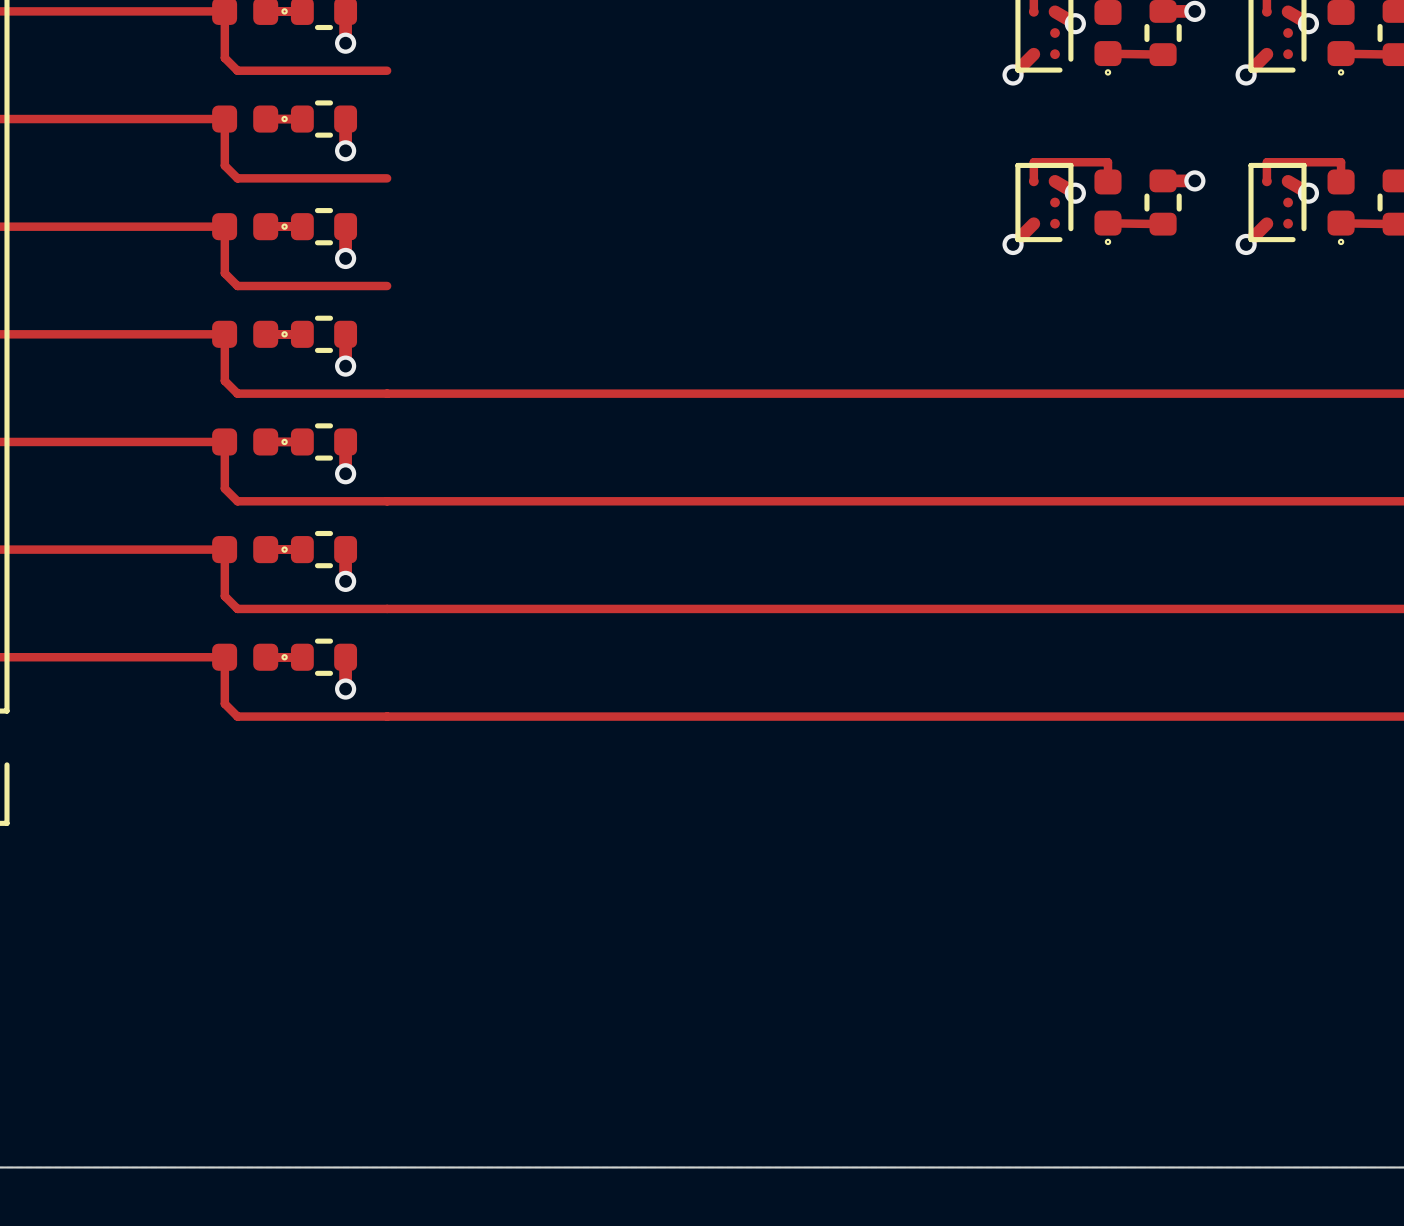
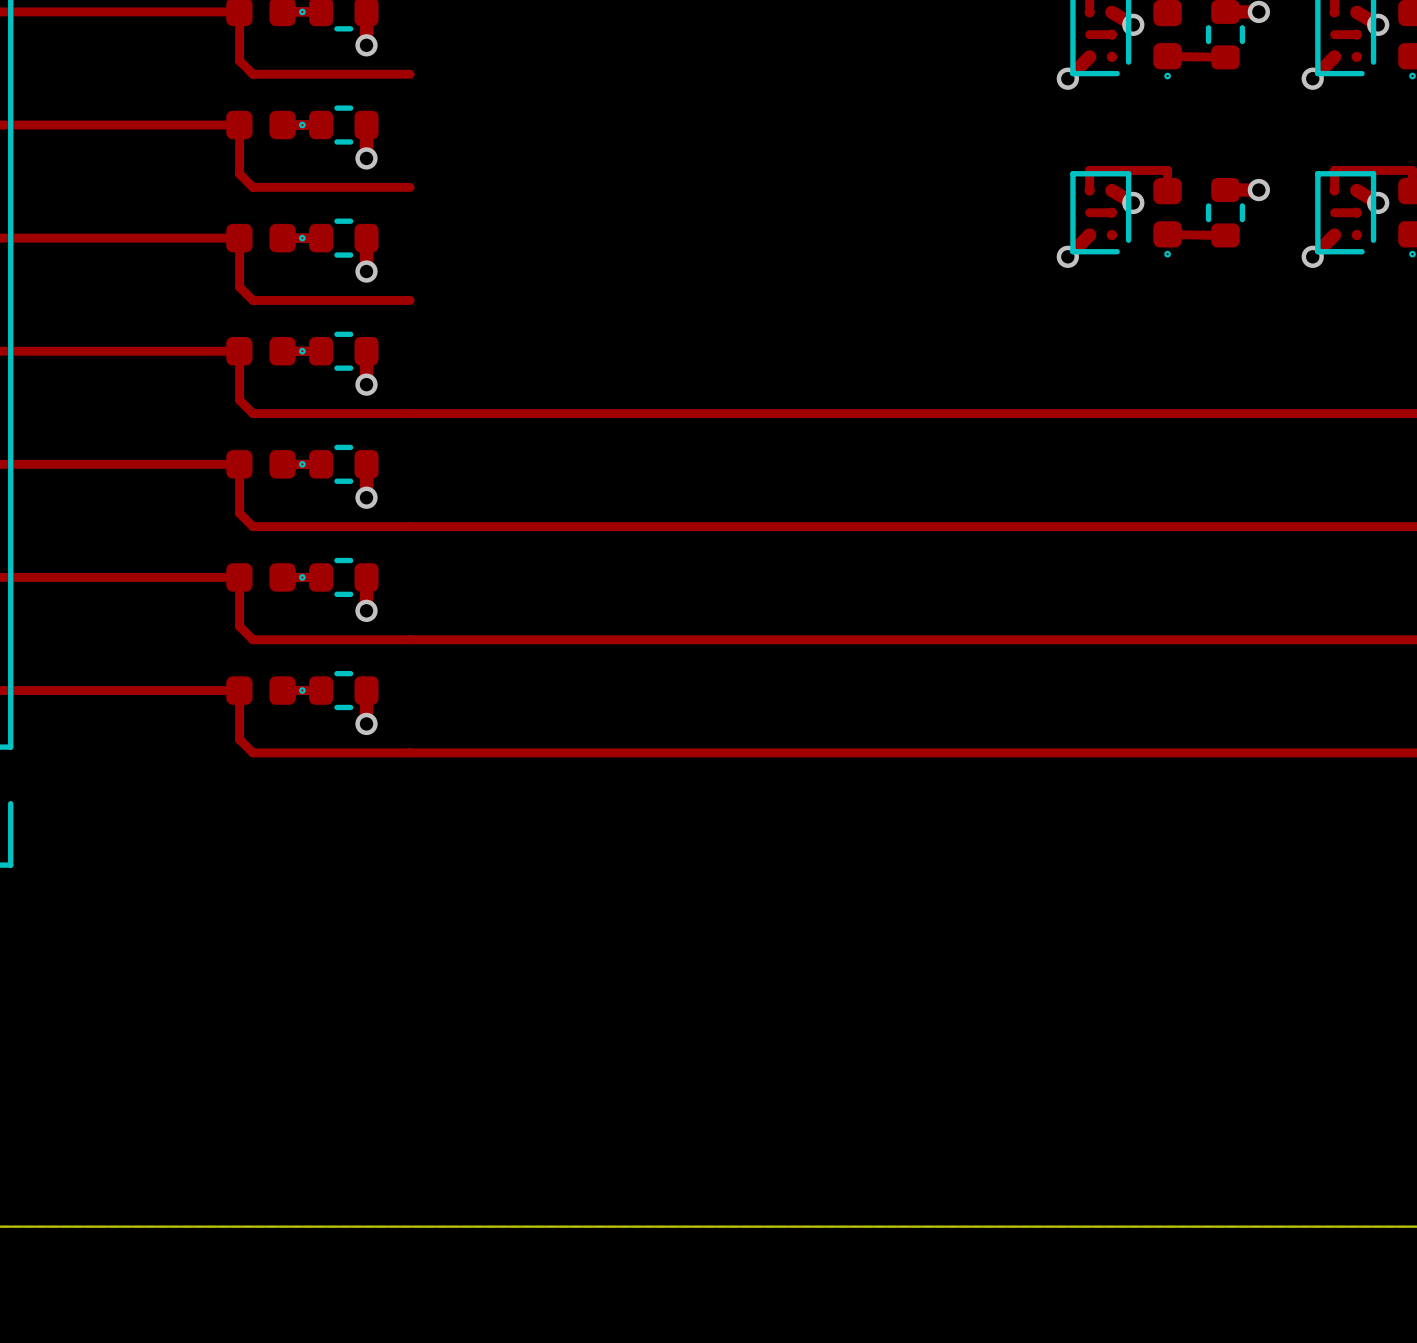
top track: none -> (1089, 34) (1111, 34)
top track: none -> (1334, 34) (1356, 34)
top track: none -> (1089, 212) (1111, 212)
top track: none -> (1334, 212) (1356, 212)

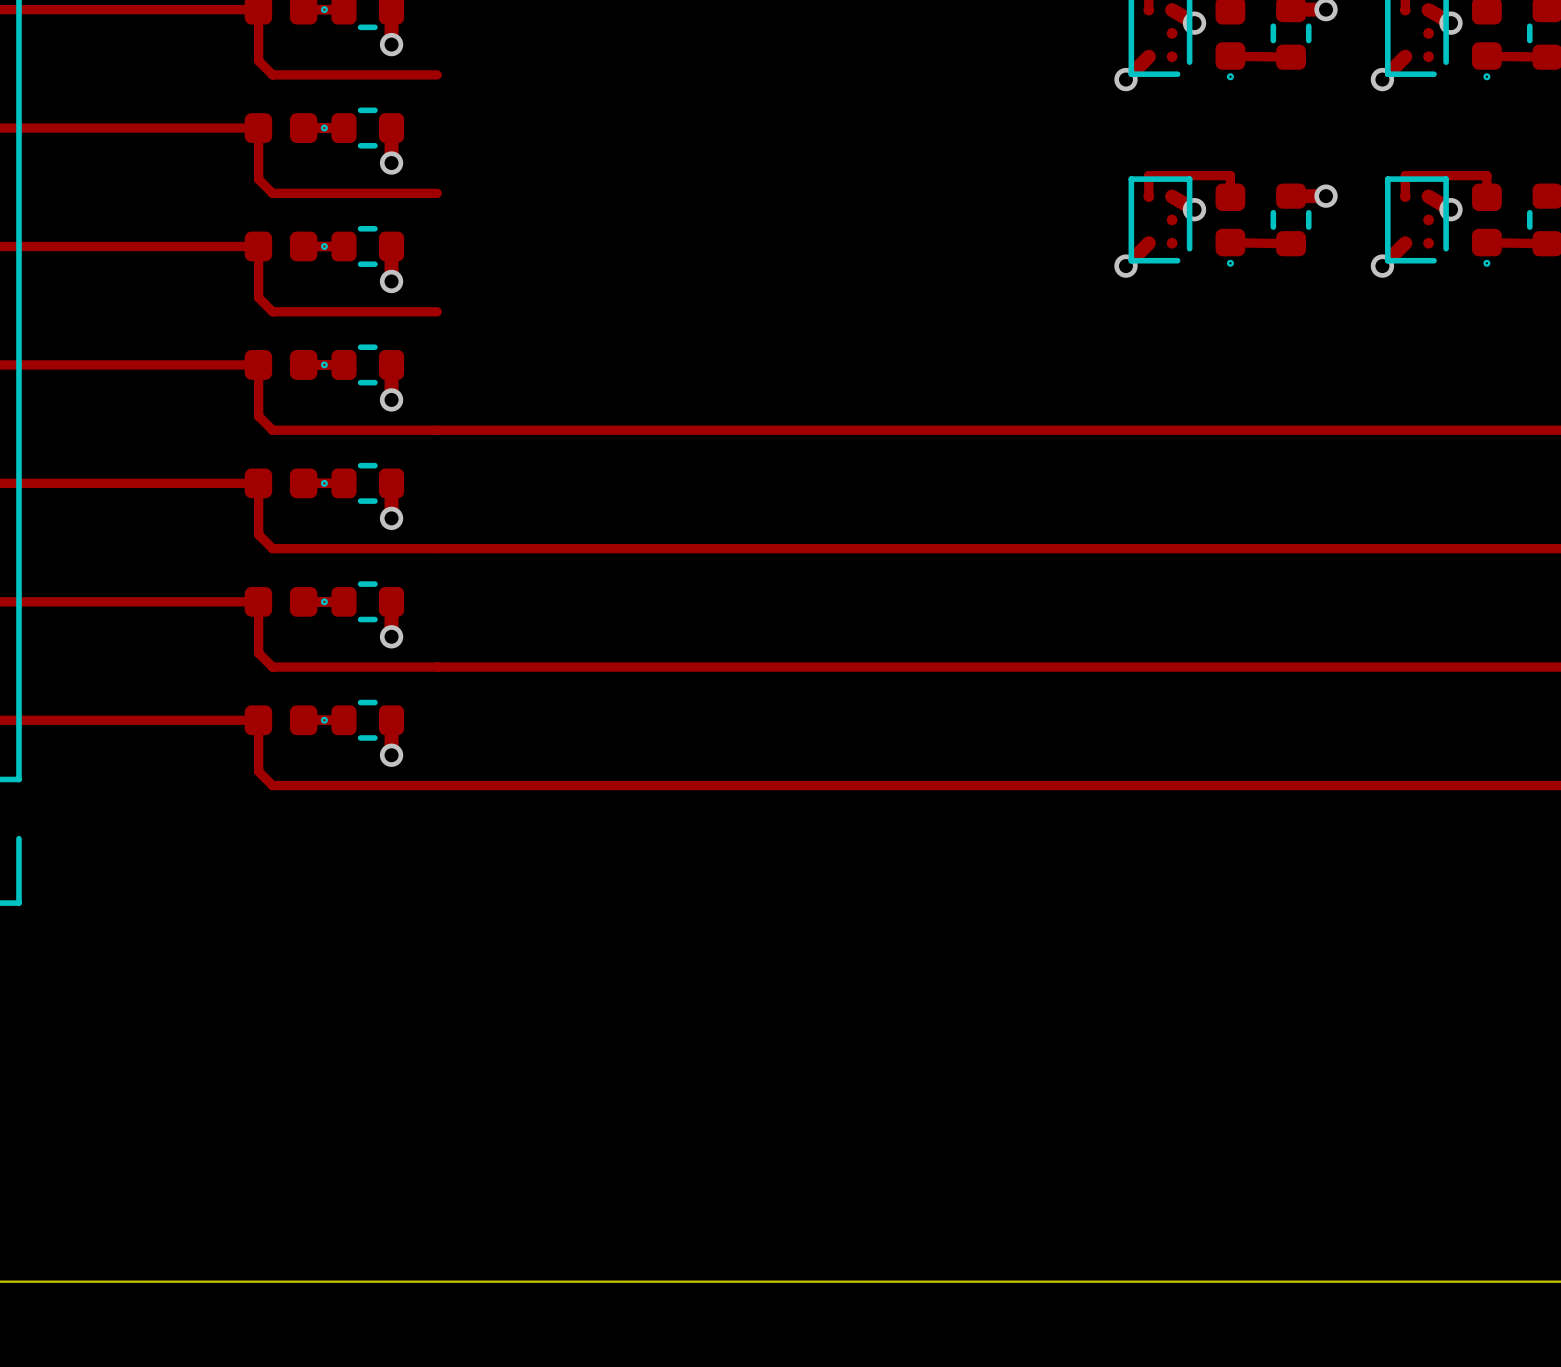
top track: (1089, 34) (1111, 34) -> none
top track: (1334, 34) (1356, 34) -> none
top track: (1089, 212) (1111, 212) -> none
top track: (1334, 212) (1356, 212) -> none

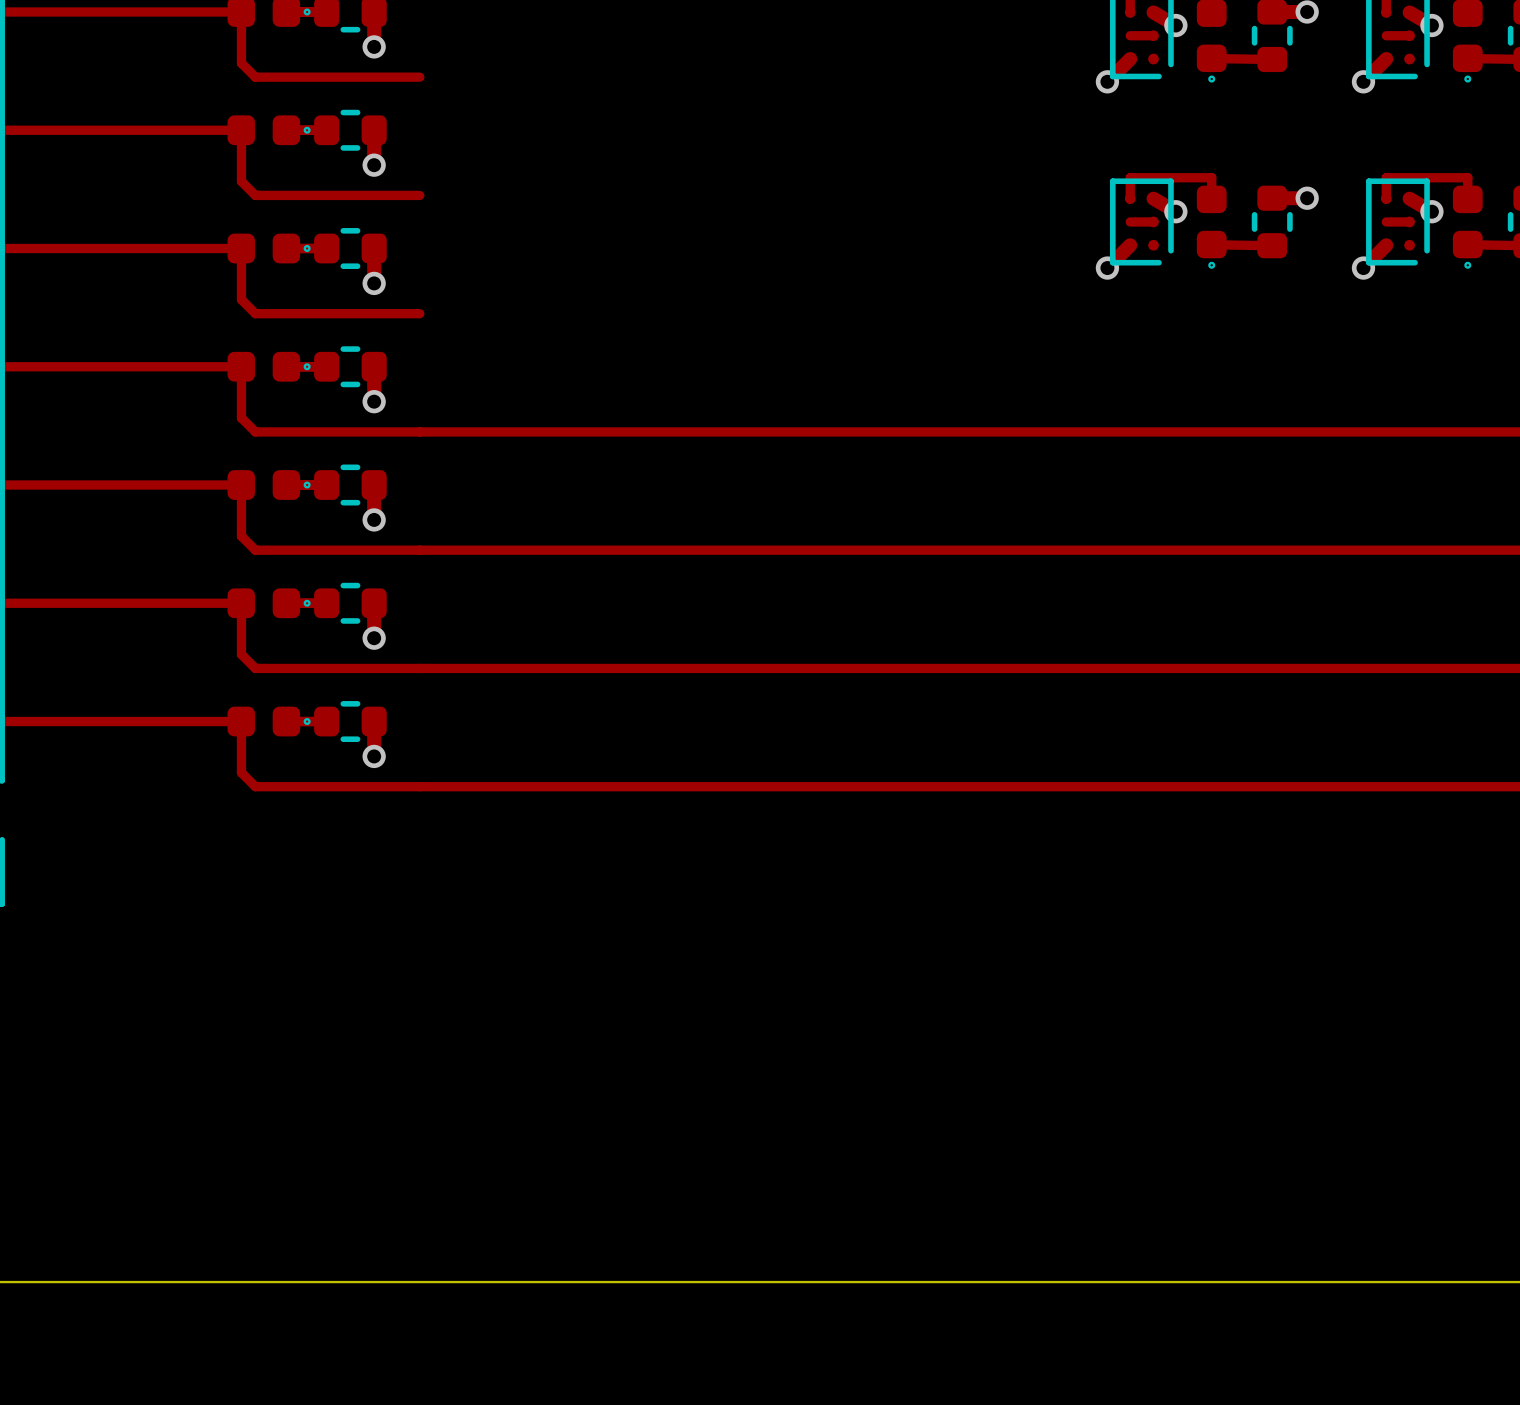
top track: none -> (1130, 35) (1153, 35)
top track: none -> (1386, 35) (1409, 35)
top track: none -> (1130, 221) (1153, 221)
top track: none -> (1386, 221) (1409, 221)

